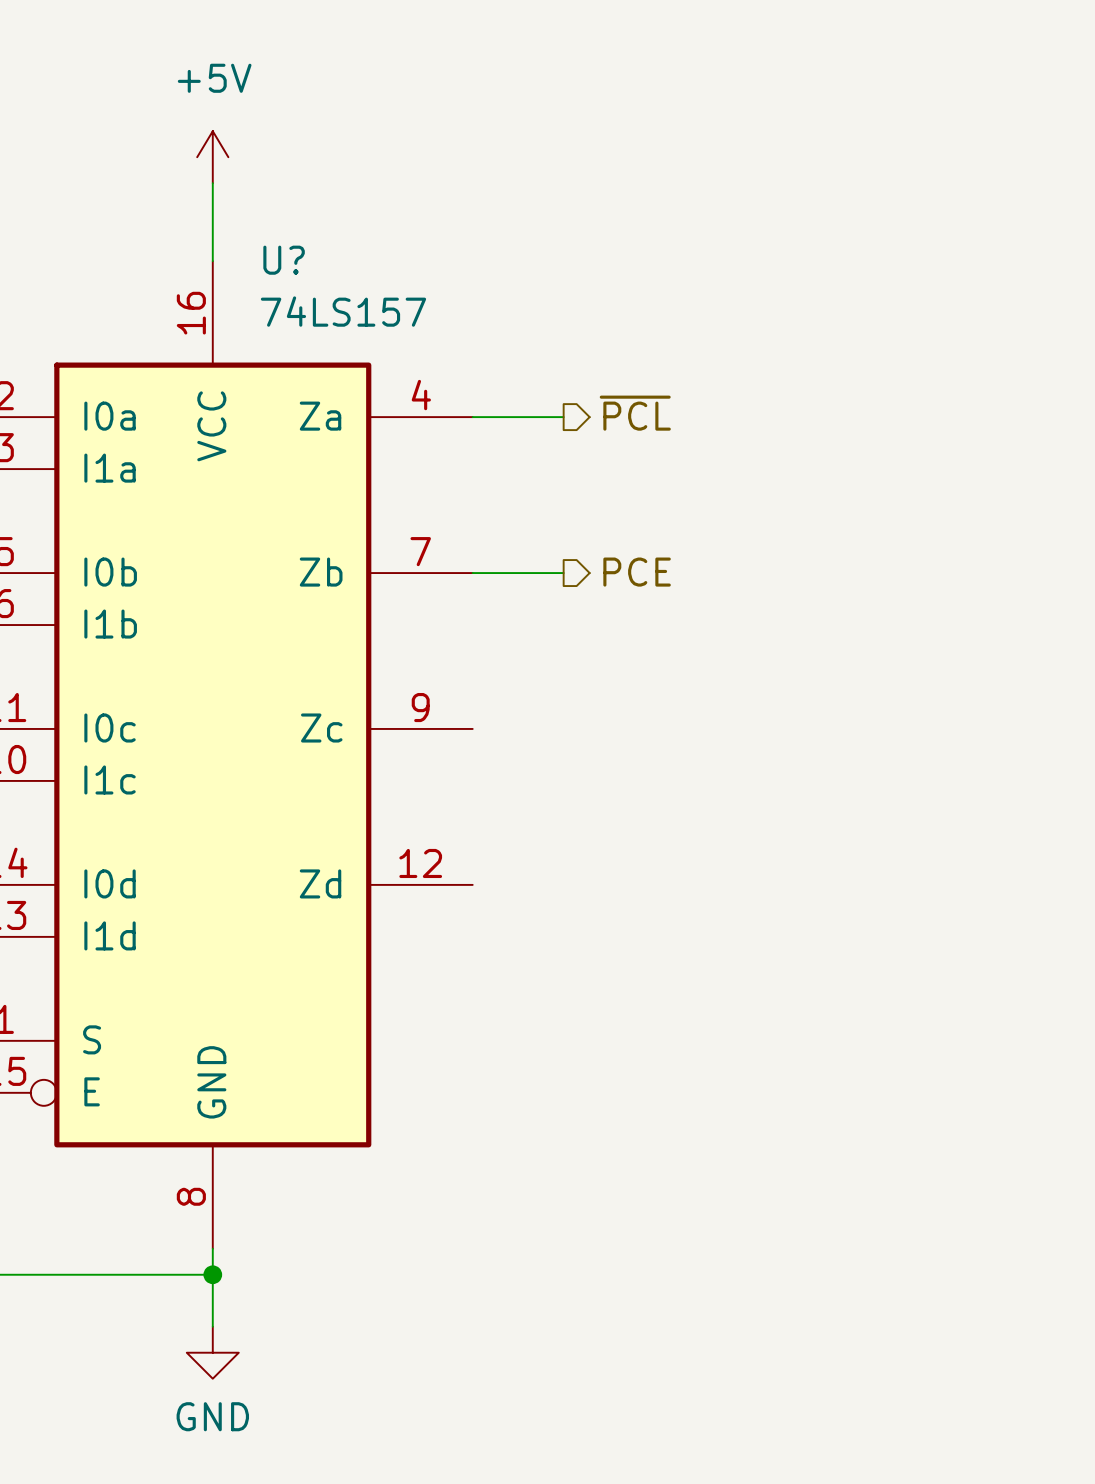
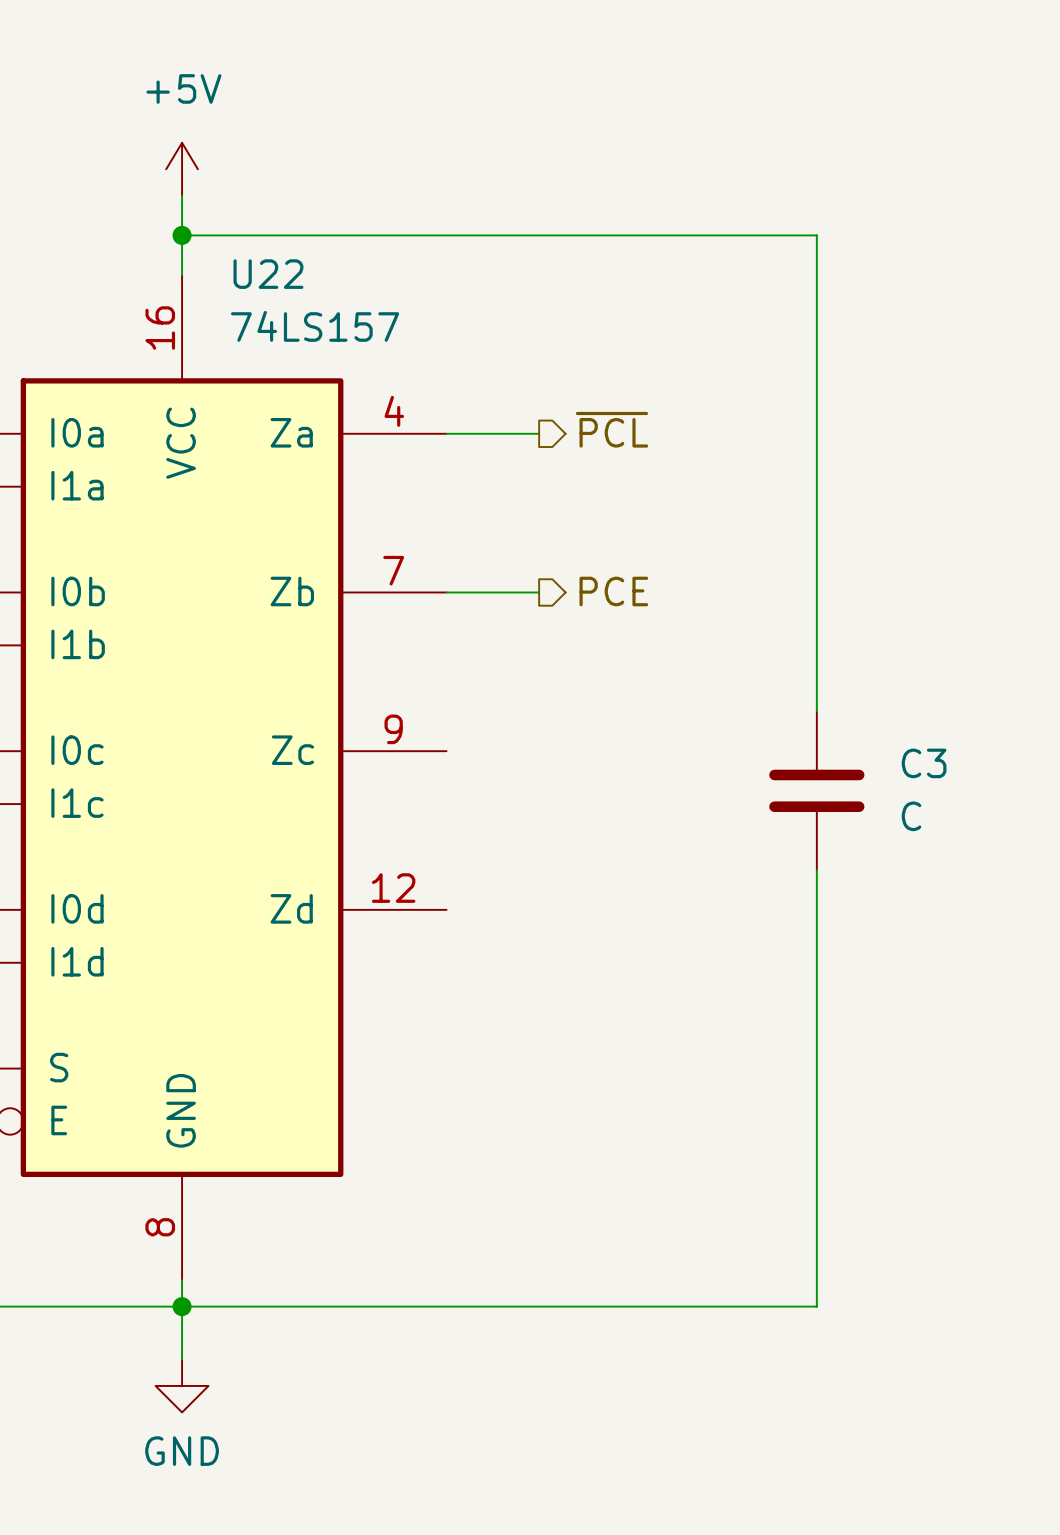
wire: none -> (182, 235) (816, 235) (816, 711)
junction: none -> (182, 235)
U? name: U? (284, 260) -> U22 (268, 274)
C3: none -> C (816, 790)
wire: none -> (816, 870) (816, 1306) (182, 1306)

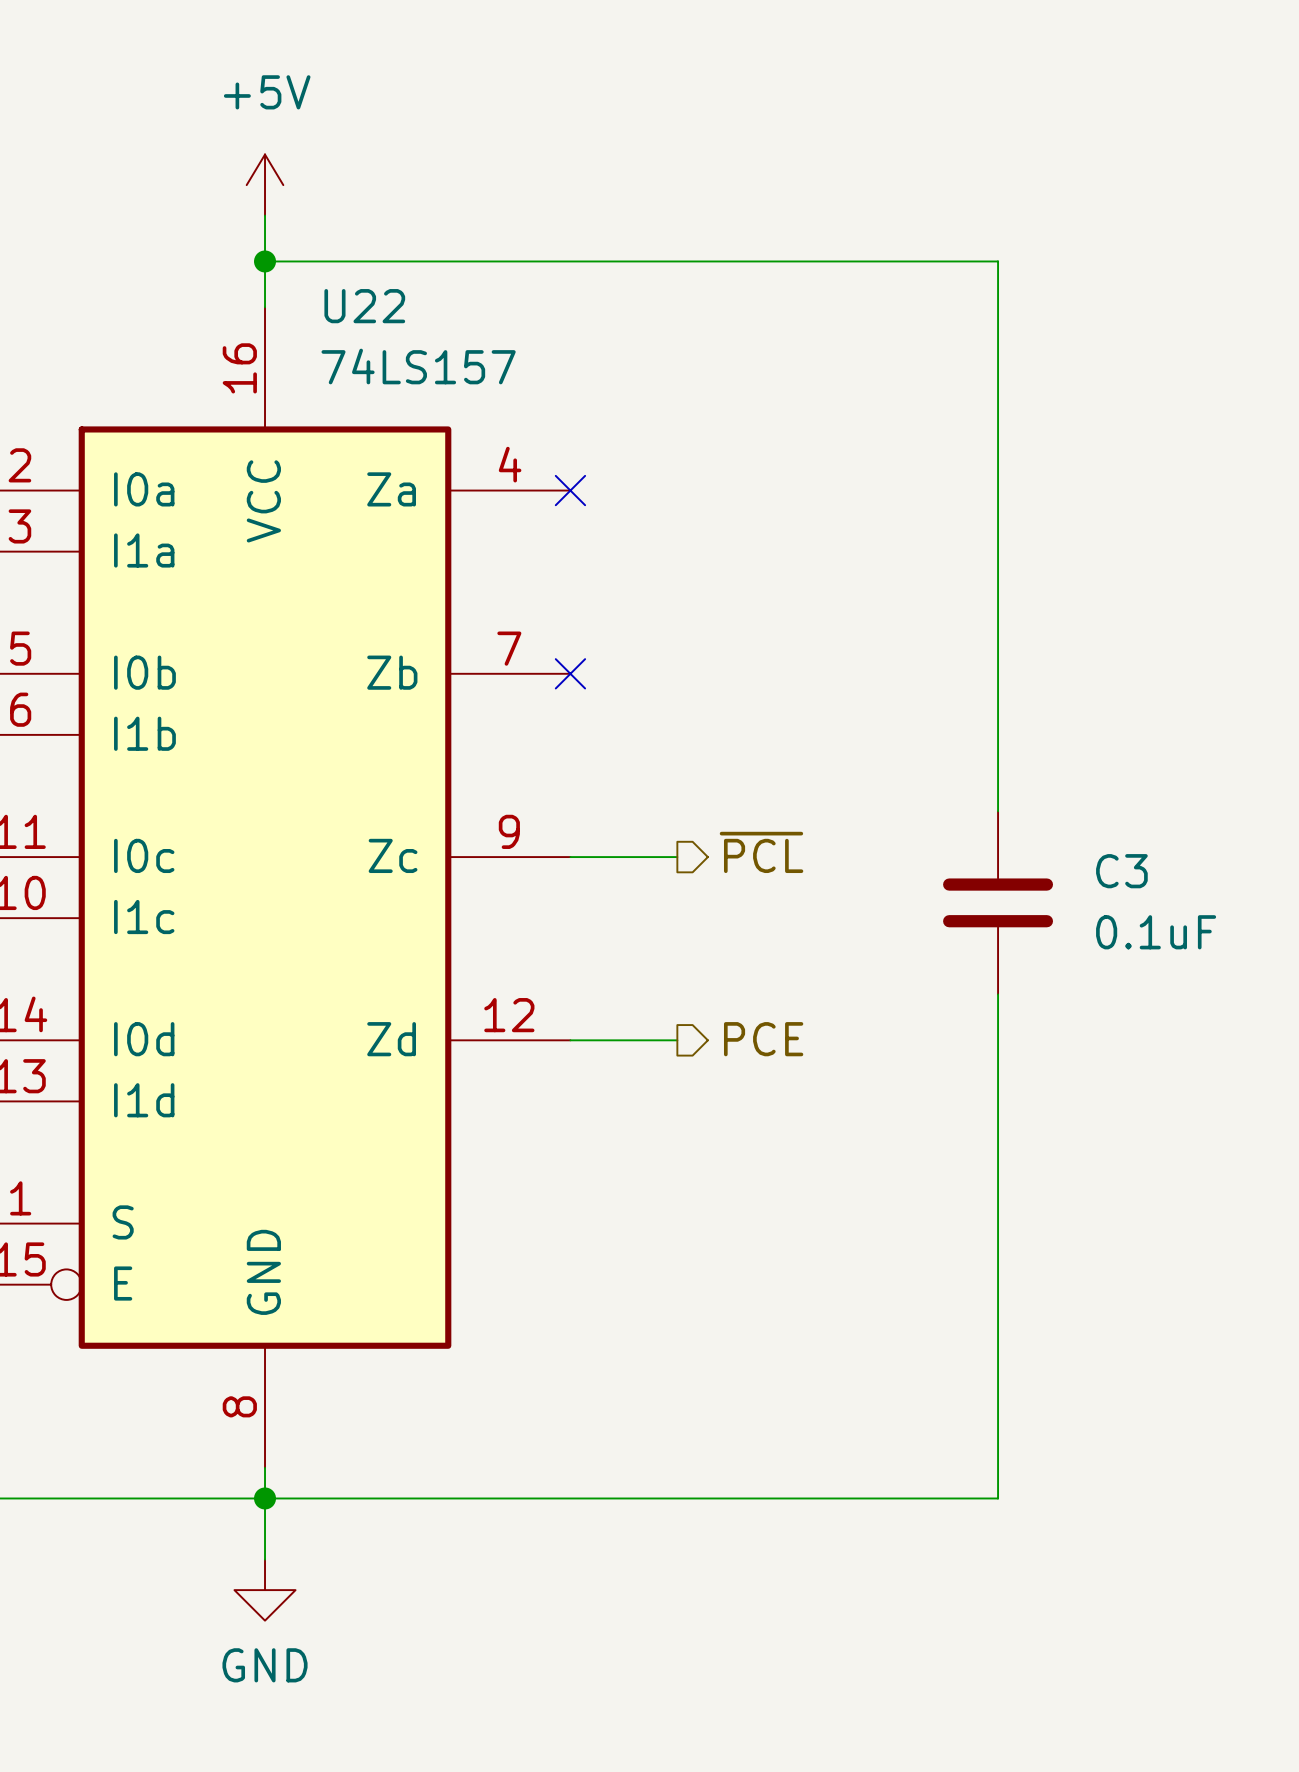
hierarchical label position: ~{PCL} (612, 429) -> ~{PCL} (761, 852)
wire: (446, 433) (539, 433) -> (570, 1040) (677, 1040)
no-connect mark: none -> (570, 490)
hierarchical label position: PCE (613, 591) -> PCE (763, 1039)
wire: (446, 592) (539, 592) -> (570, 857) (677, 857)
no-connect mark: none -> (570, 673)
C3 value: C (911, 816) -> 0.1uF (1156, 932)

